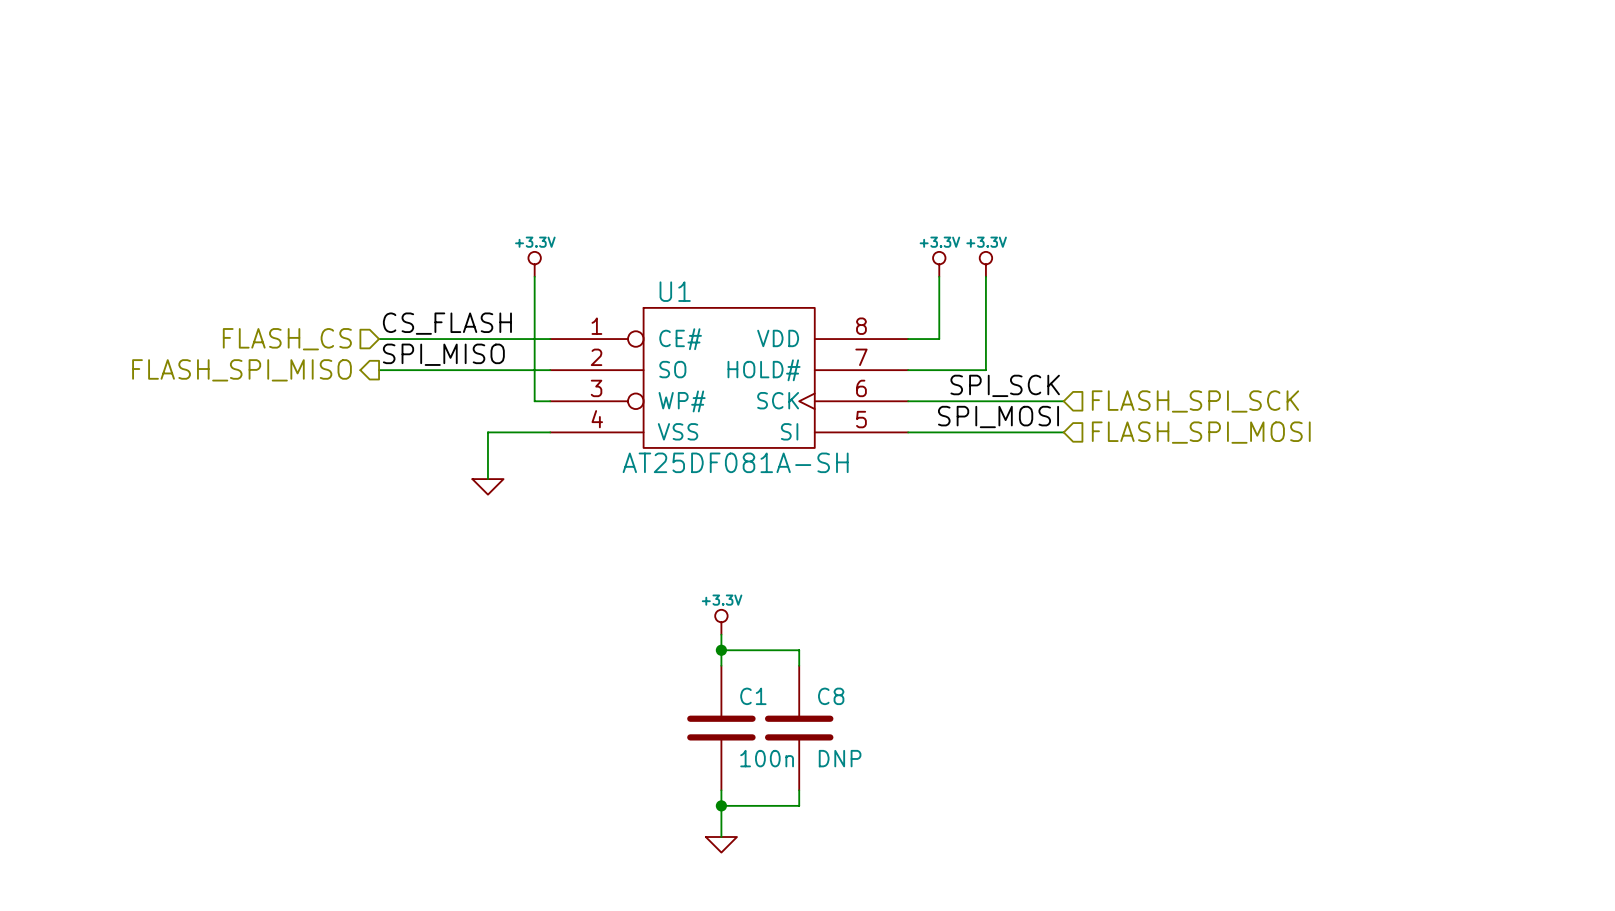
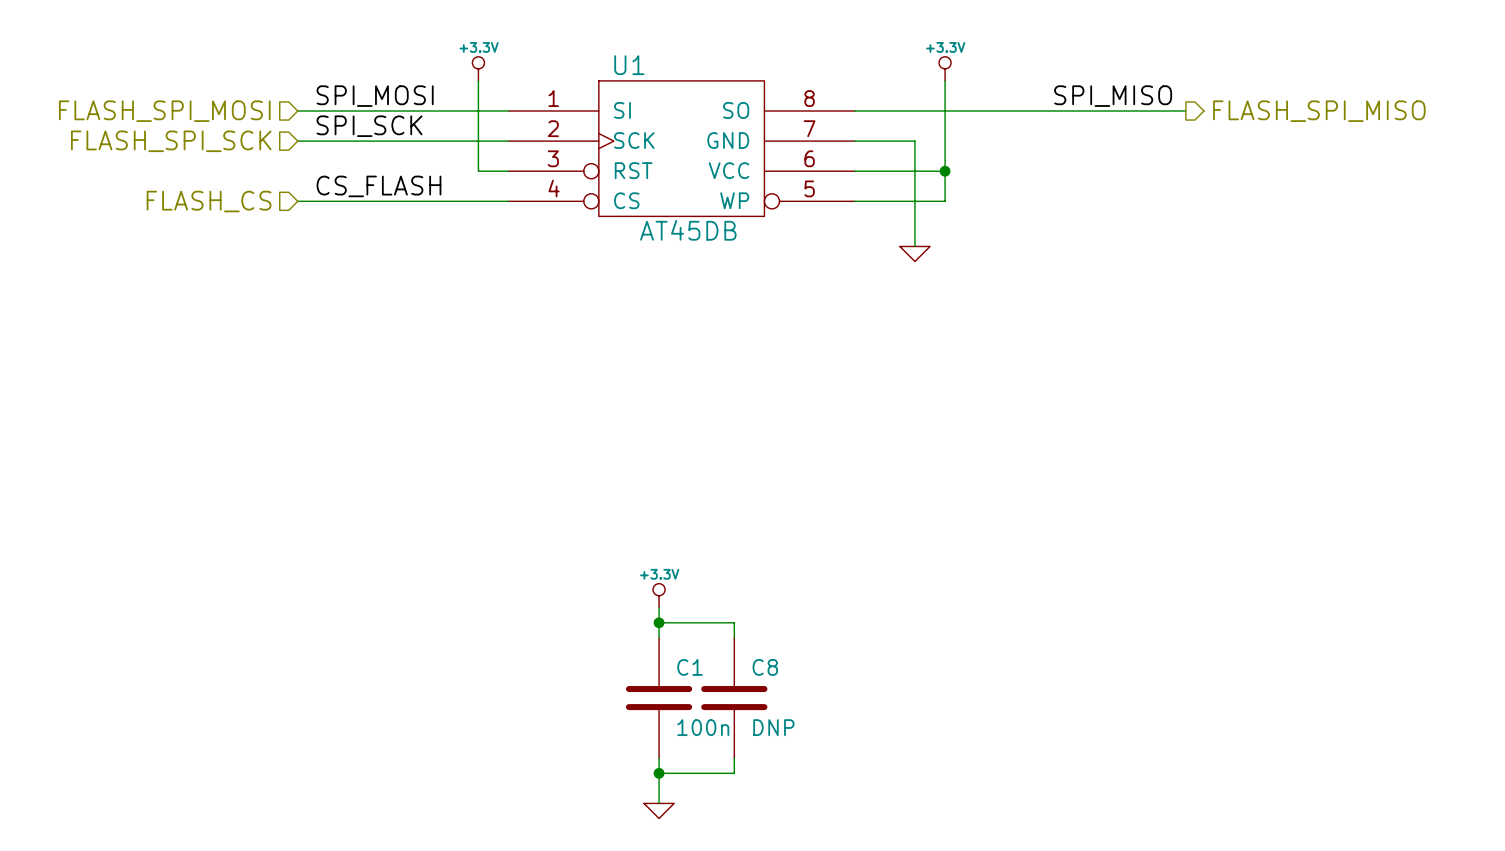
wire: none -> (478, 80) (478, 171) (508, 171)
wire: none -> (945, 80) (945, 201) (854, 201)
label: none -> SPI_MOSI (375, 96)
label: none -> SPI_MISO (1113, 96)
hierarchical label: none -> FLASH_SPI_MOSI (164, 111)
wire: none -> (297, 111) (508, 111)
wire: none -> (854, 111) (1185, 111)
hierarchical label: none -> FLASH_SPI_MISO (1319, 111)
label: none -> SPI_SCK (369, 126)
hierarchical label: none -> FLASH_SPI_SCK (171, 141)
wire: none -> (297, 141) (508, 141)
wire: none -> (854, 141) (914, 141) (914, 246)
wire: none -> (854, 171) (945, 171)
junction: none -> (945, 171)
wire: none -> (297, 201) (508, 201)
power symbol text: +3.3V (986, 242) -> none
power symbol shape: [979, 251, 993, 277] -> [899, 246, 931, 262]
power symbol position: +3.3V (534, 264) -> +3.3V (478, 68)
power symbol position: +3.3V (939, 264) -> +3.3V (945, 68)
wire: (534, 276) (534, 401) (550, 401) -> none
wire: (939, 276) (939, 339) (908, 339) -> none
wire: (985, 276) (985, 370) (908, 370) -> none
U1 symbol: [550, 307, 909, 448] -> [508, 80, 855, 217]
label position: CS_FLASH (447, 323) -> CS_FLASH (378, 186)
hierarchical label position: FLASH_CS (287, 339) -> FLASH_CS (209, 201)
wire: (379, 339) (550, 339) -> none
label: SPI_MISO (443, 354) -> none
hierarchical label: FLASH_SPI_MISO (241, 370) -> none
wire: (379, 370) (550, 370) -> none
label: SPI_SCK (1005, 385) -> none
wire: (908, 401) (1063, 401) -> none
hierarchical label: FLASH_SPI_SCK (1195, 401) -> none
label: SPI_MOSI (998, 417) -> none
wire: (550, 432) (487, 432) (487, 479) -> none
wire: (908, 432) (1063, 432) -> none
hierarchical label: FLASH_SPI_MOSI (1201, 432) -> none
U1 value: AT25DF081A-SH (735, 462) -> AT45DB (688, 230)
power symbol: (487, 486) -> none

